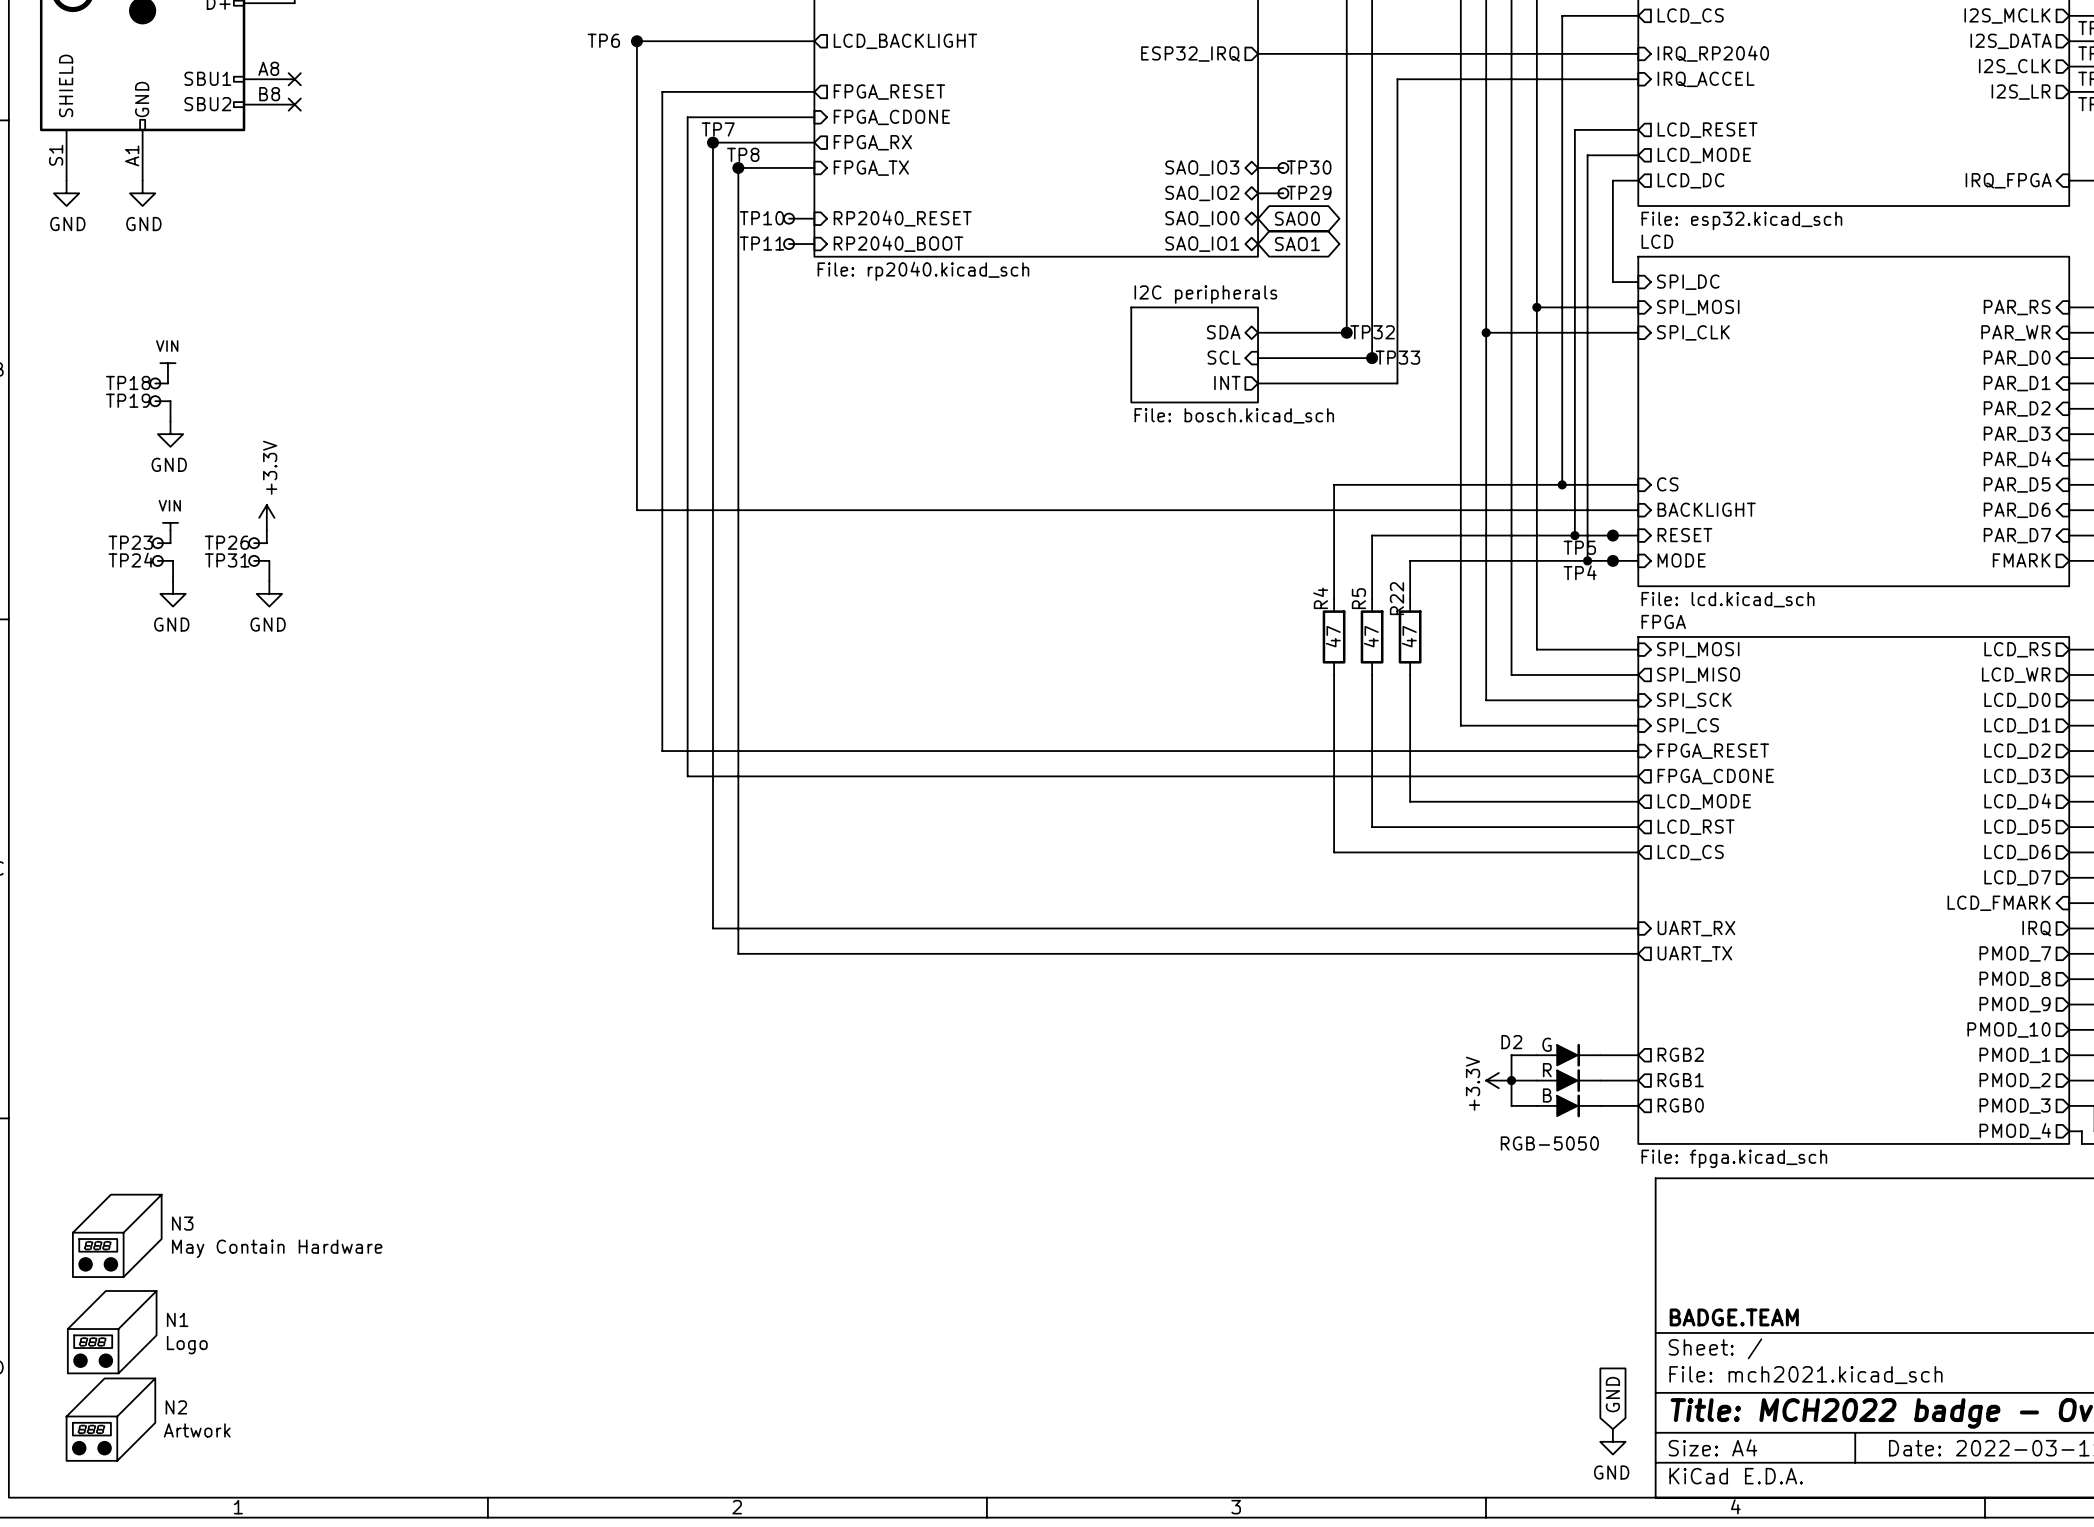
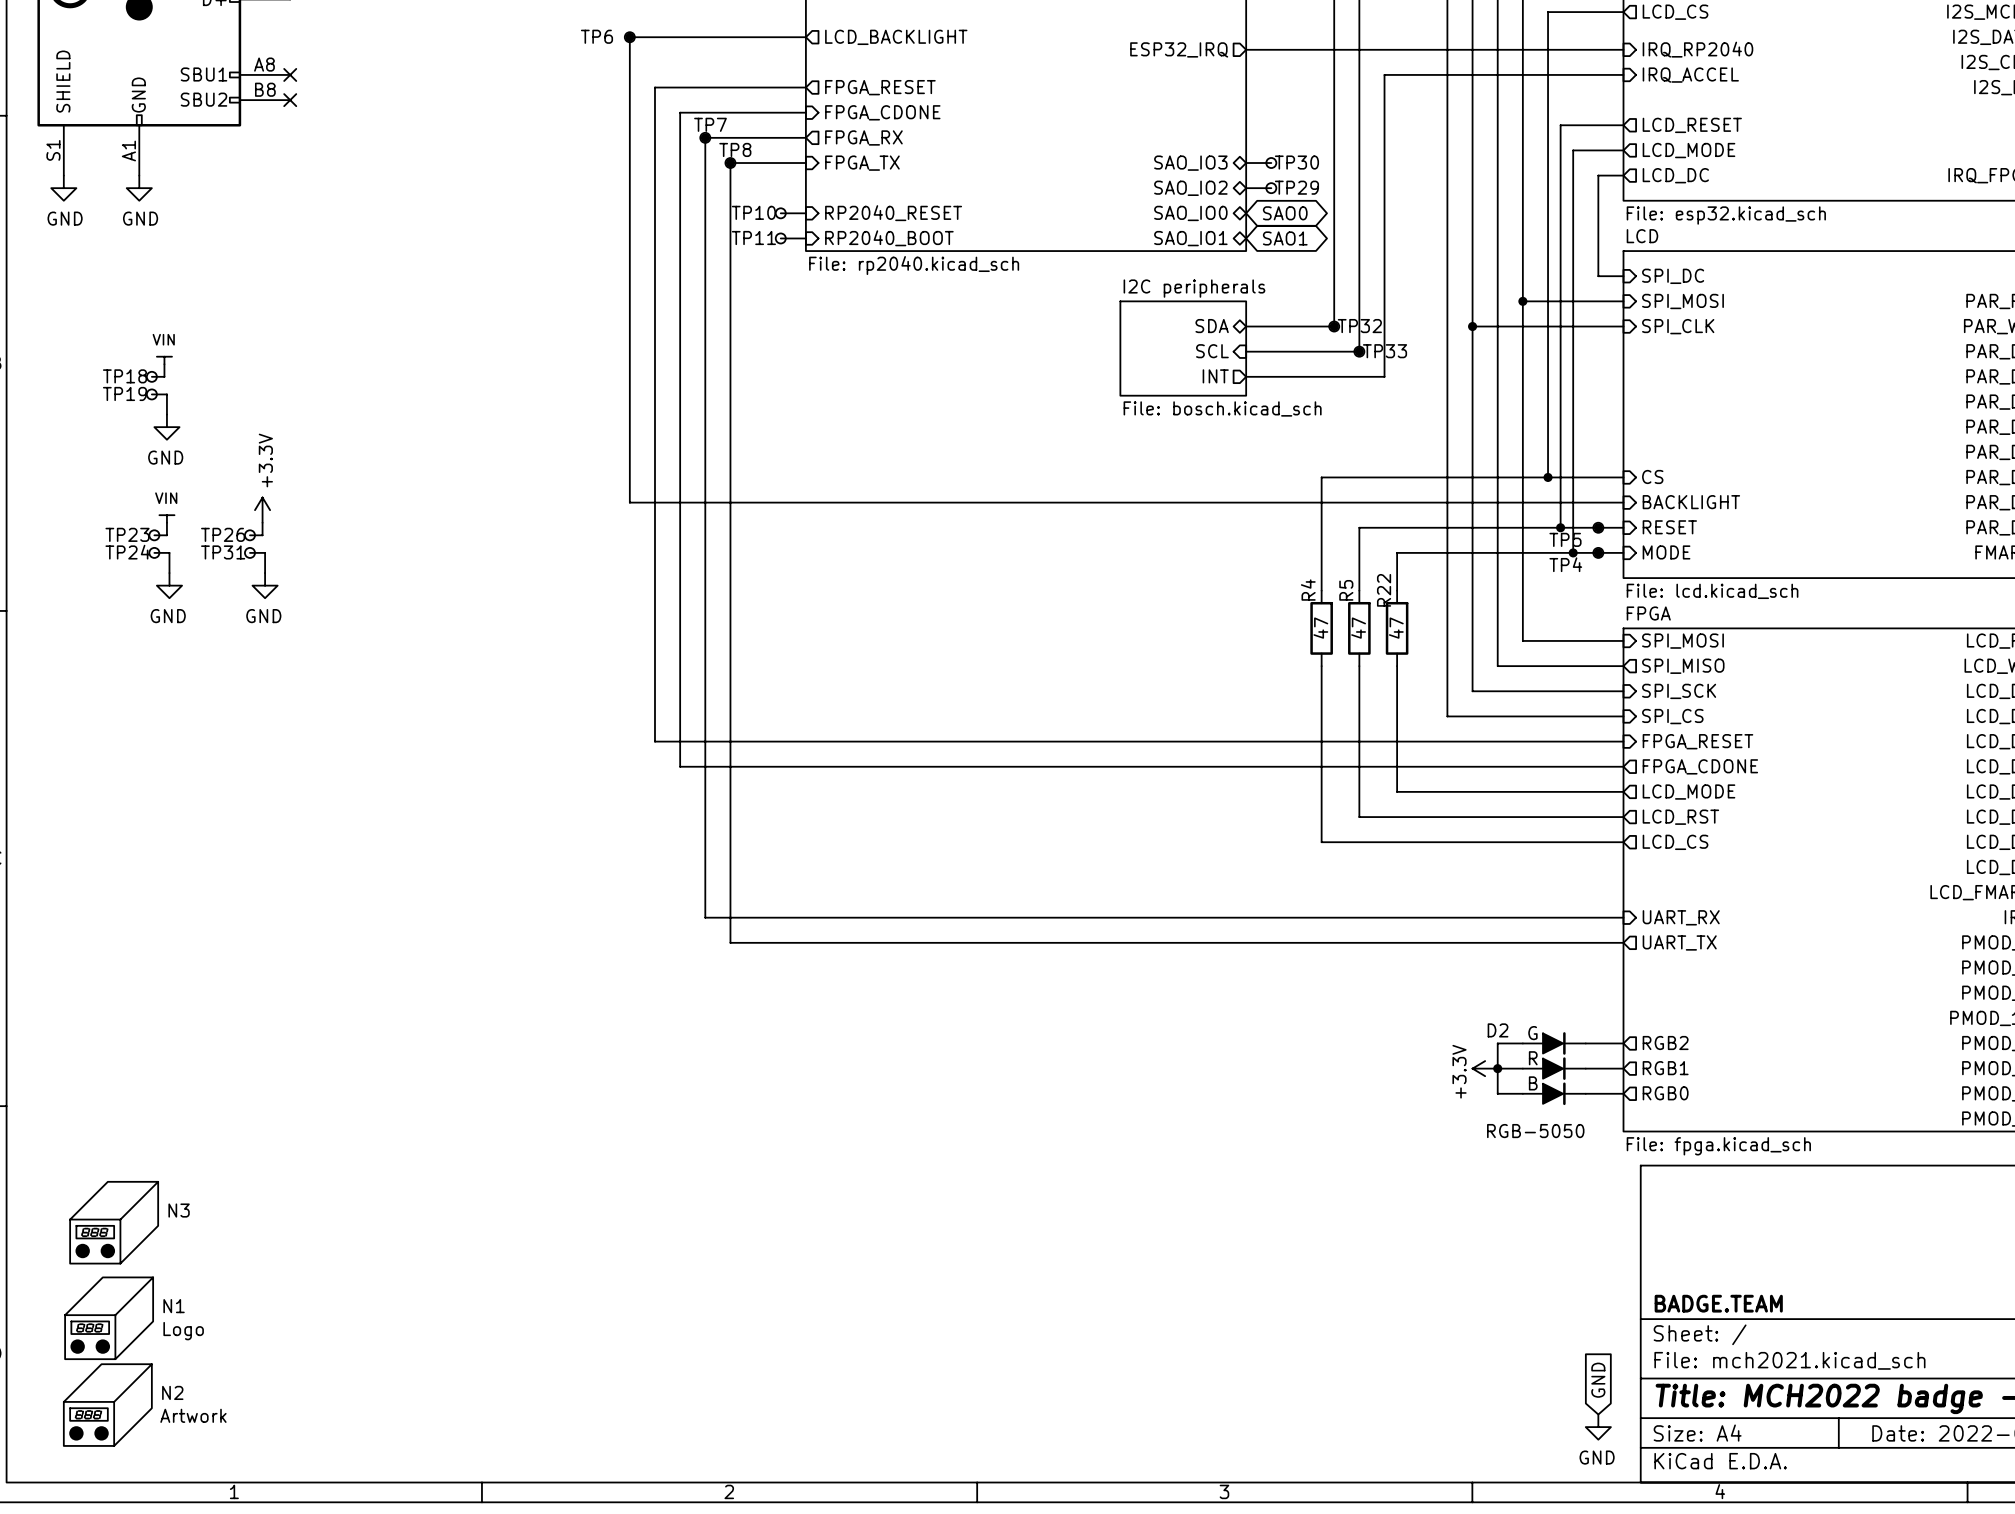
N3 value: May Contain Hardware (277, 1248) -> none

